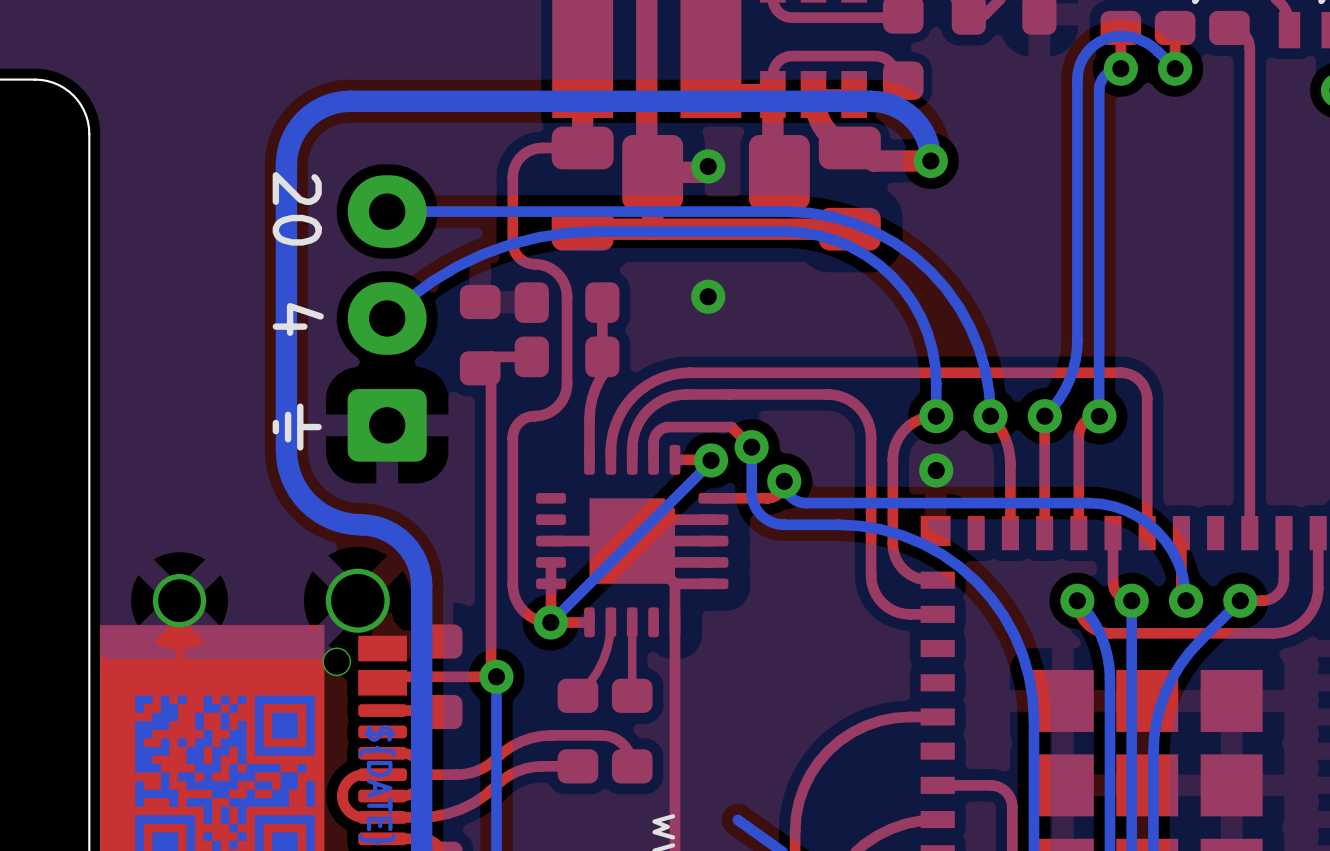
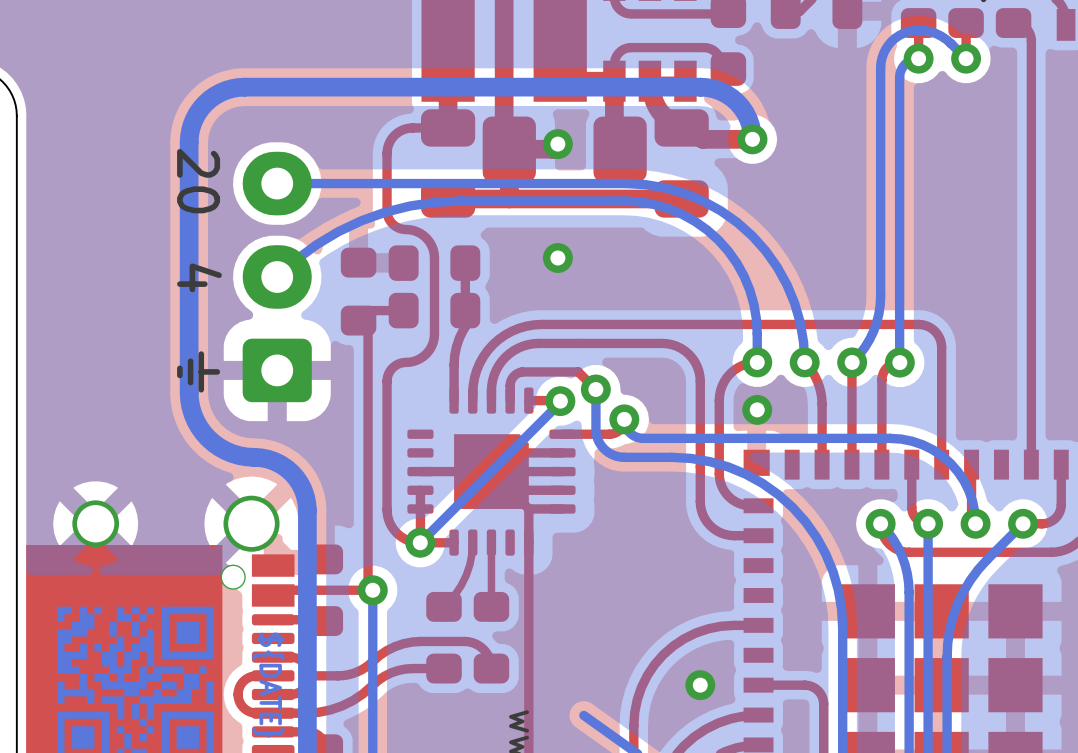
via: none -> (700, 685)

